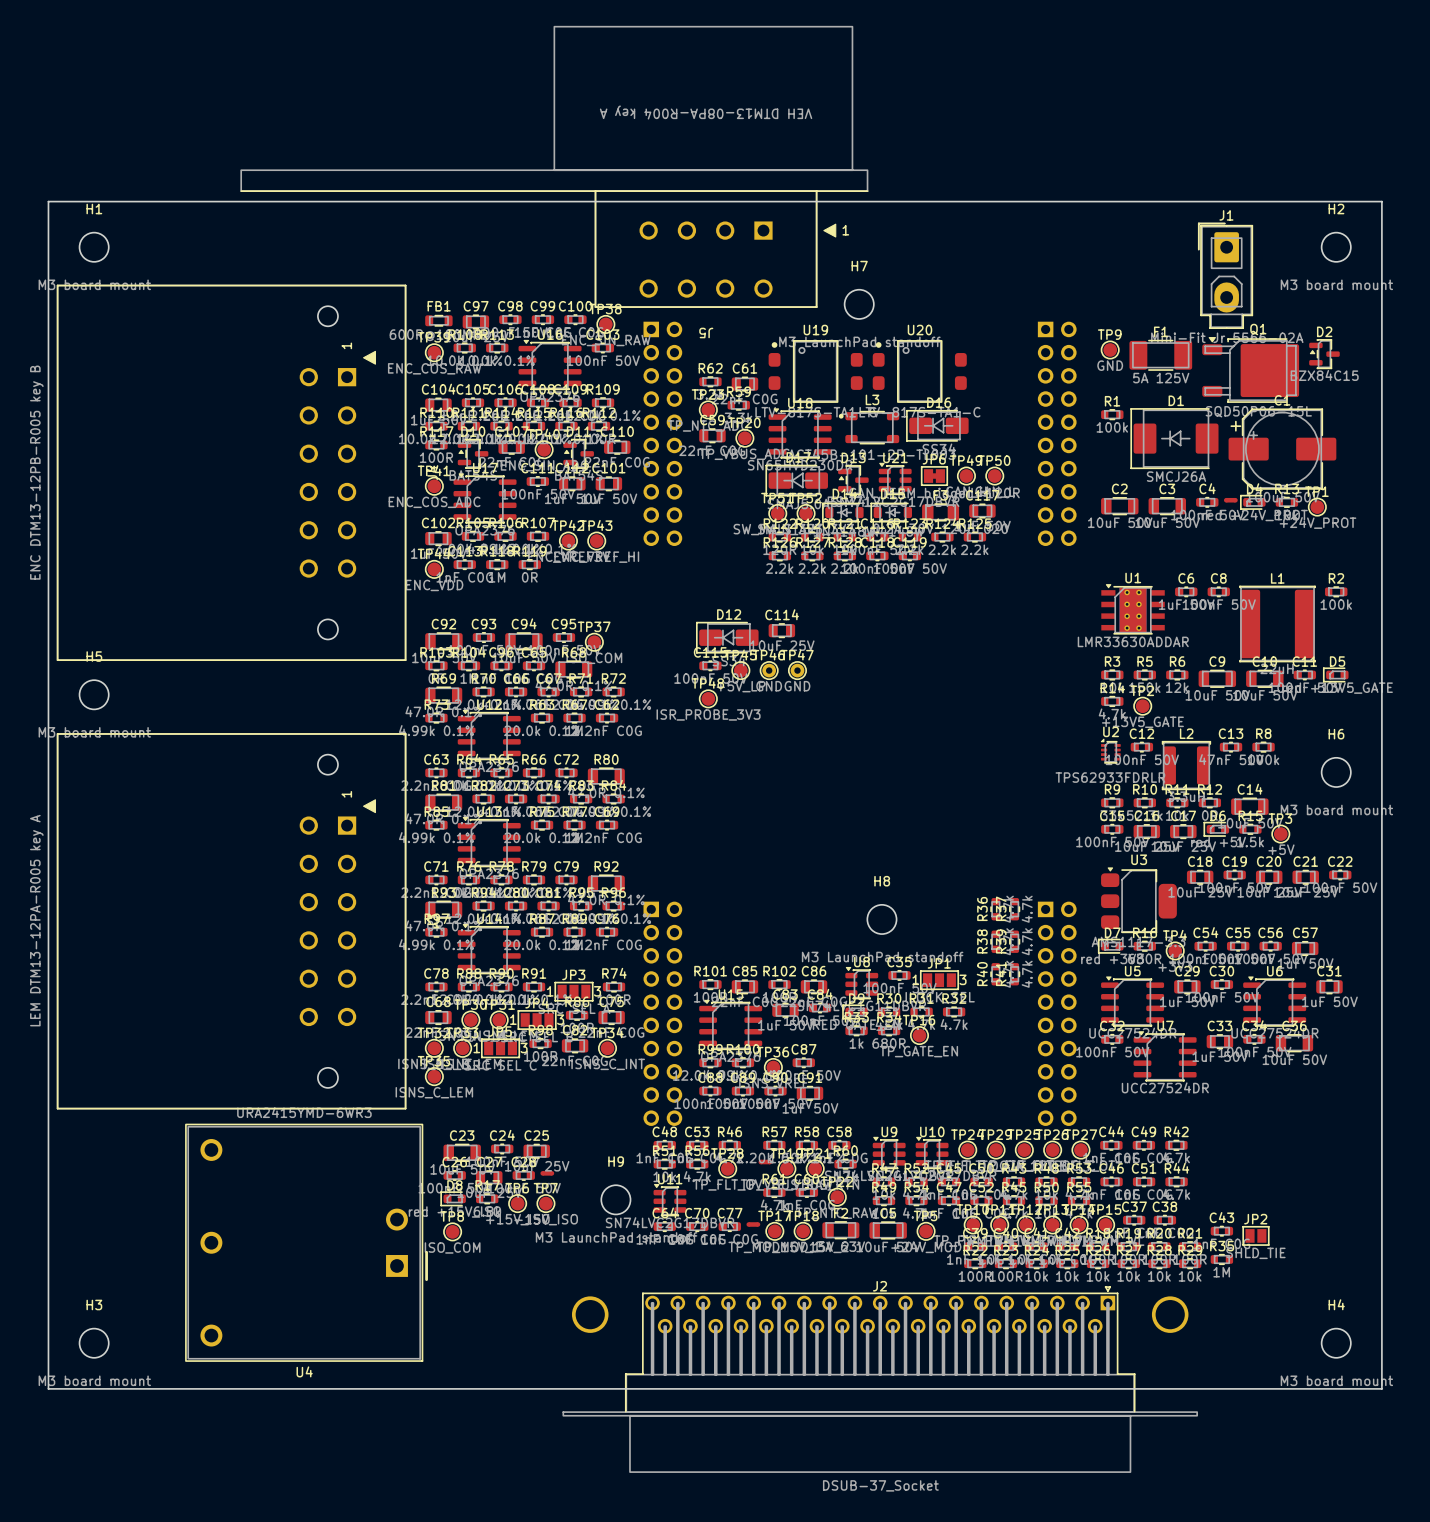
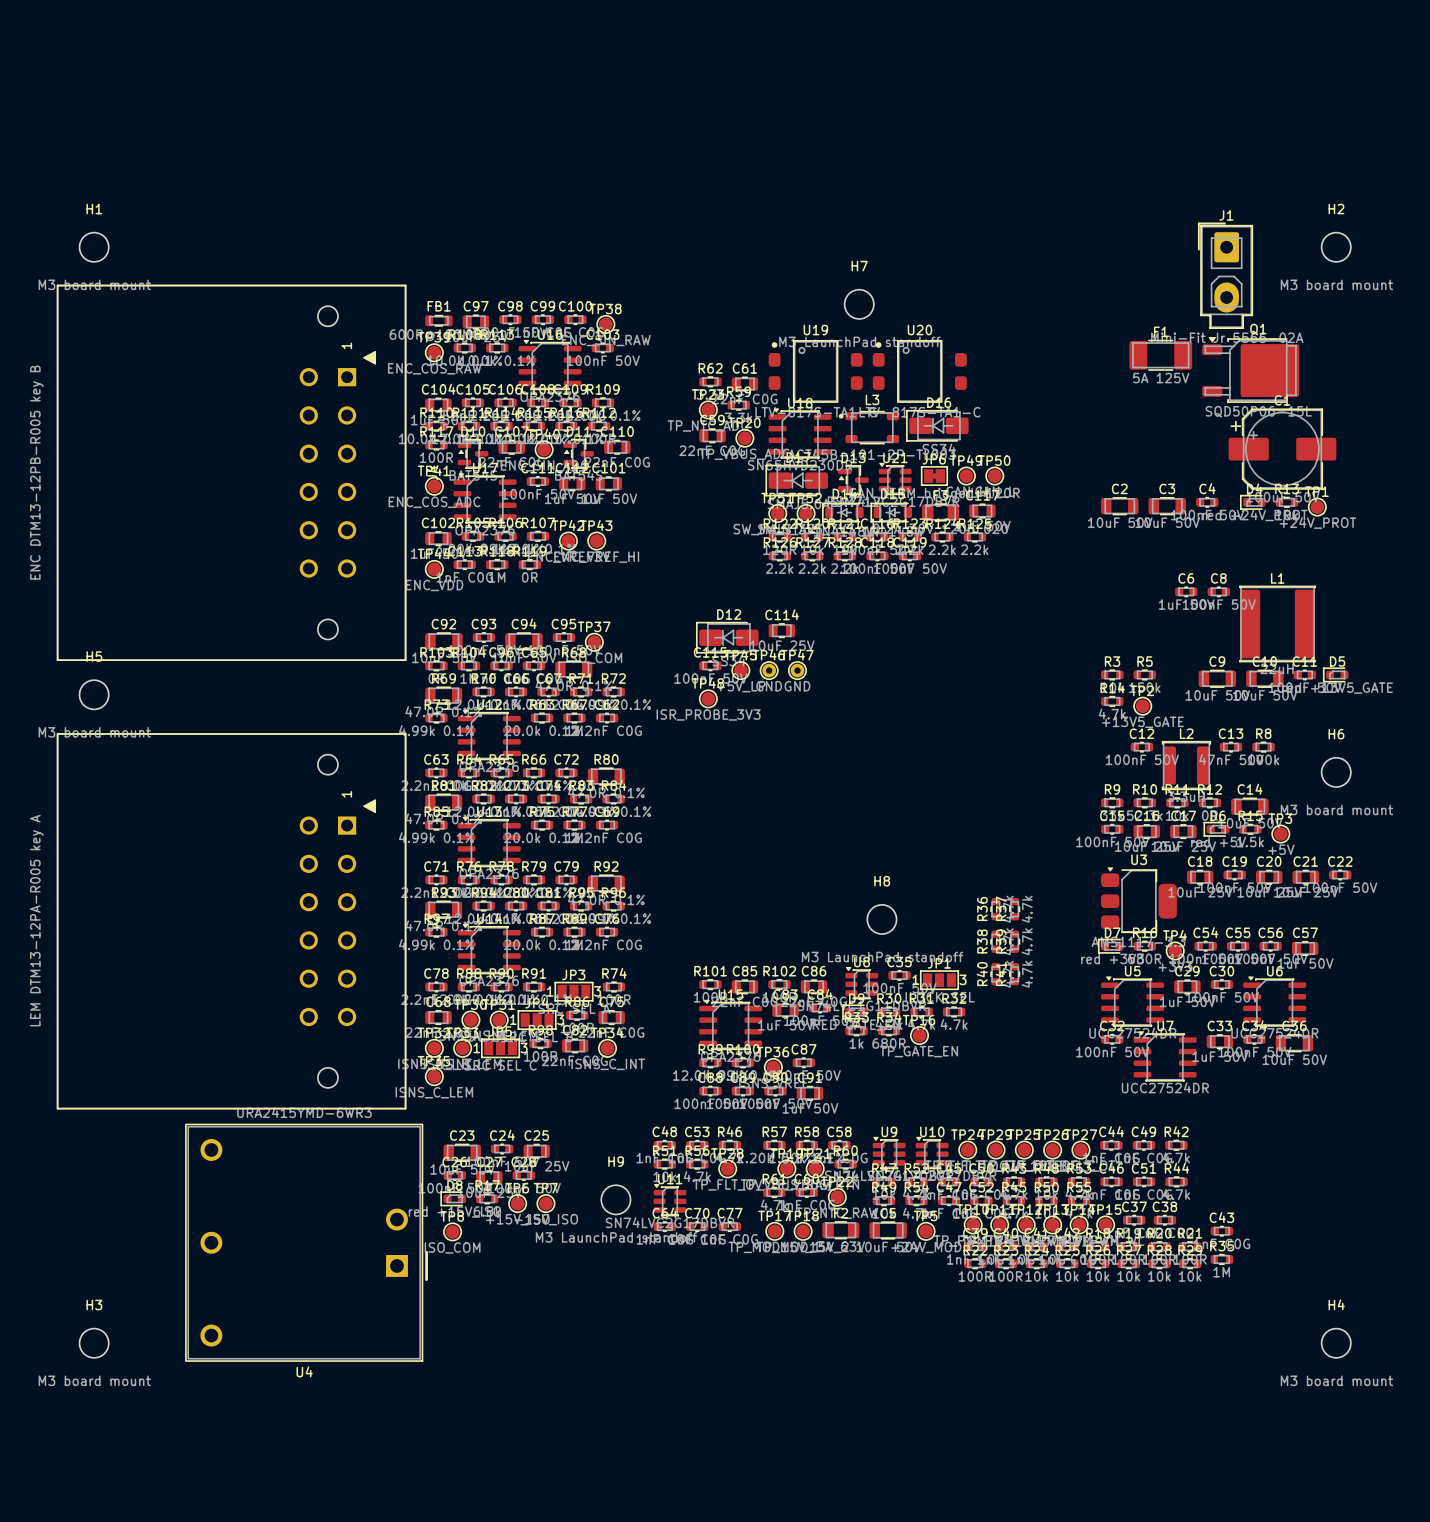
J5: VEH DTM13-08PA-R004 key A (554, 166) -> none
board edge: (48, 201) (1381, 201) (1381, 1388) (48, 1388) (48, 201) -> none
TP9: GND (1110, 350) -> none
D2: BZX84C15 (1324, 354) -> none
R1: 100k (1112, 414) -> none
part: (662, 433) -> none
part: (1057, 433) -> none
D1: SMCJ26A (1174, 438) -> none
part: (1230, 500) -> none
R2: 100k (1336, 591) -> none
U1: LMR33630ADDAR (1133, 609) -> none
R6: 12k (1177, 674) -> none
U2: TPS62933FDRLR (1110, 751) -> none
C31: 1uF 50V (1329, 986) -> none
part: (662, 1013) -> none
part: (1057, 1013) -> none
part: (765, 1162) -> none
part: (547, 1173) -> none
part: (753, 1224) -> none
JP2: SHLD_TIE (1255, 1235) -> none
J2: DSUB-37_Socket (880, 1379) -> none

